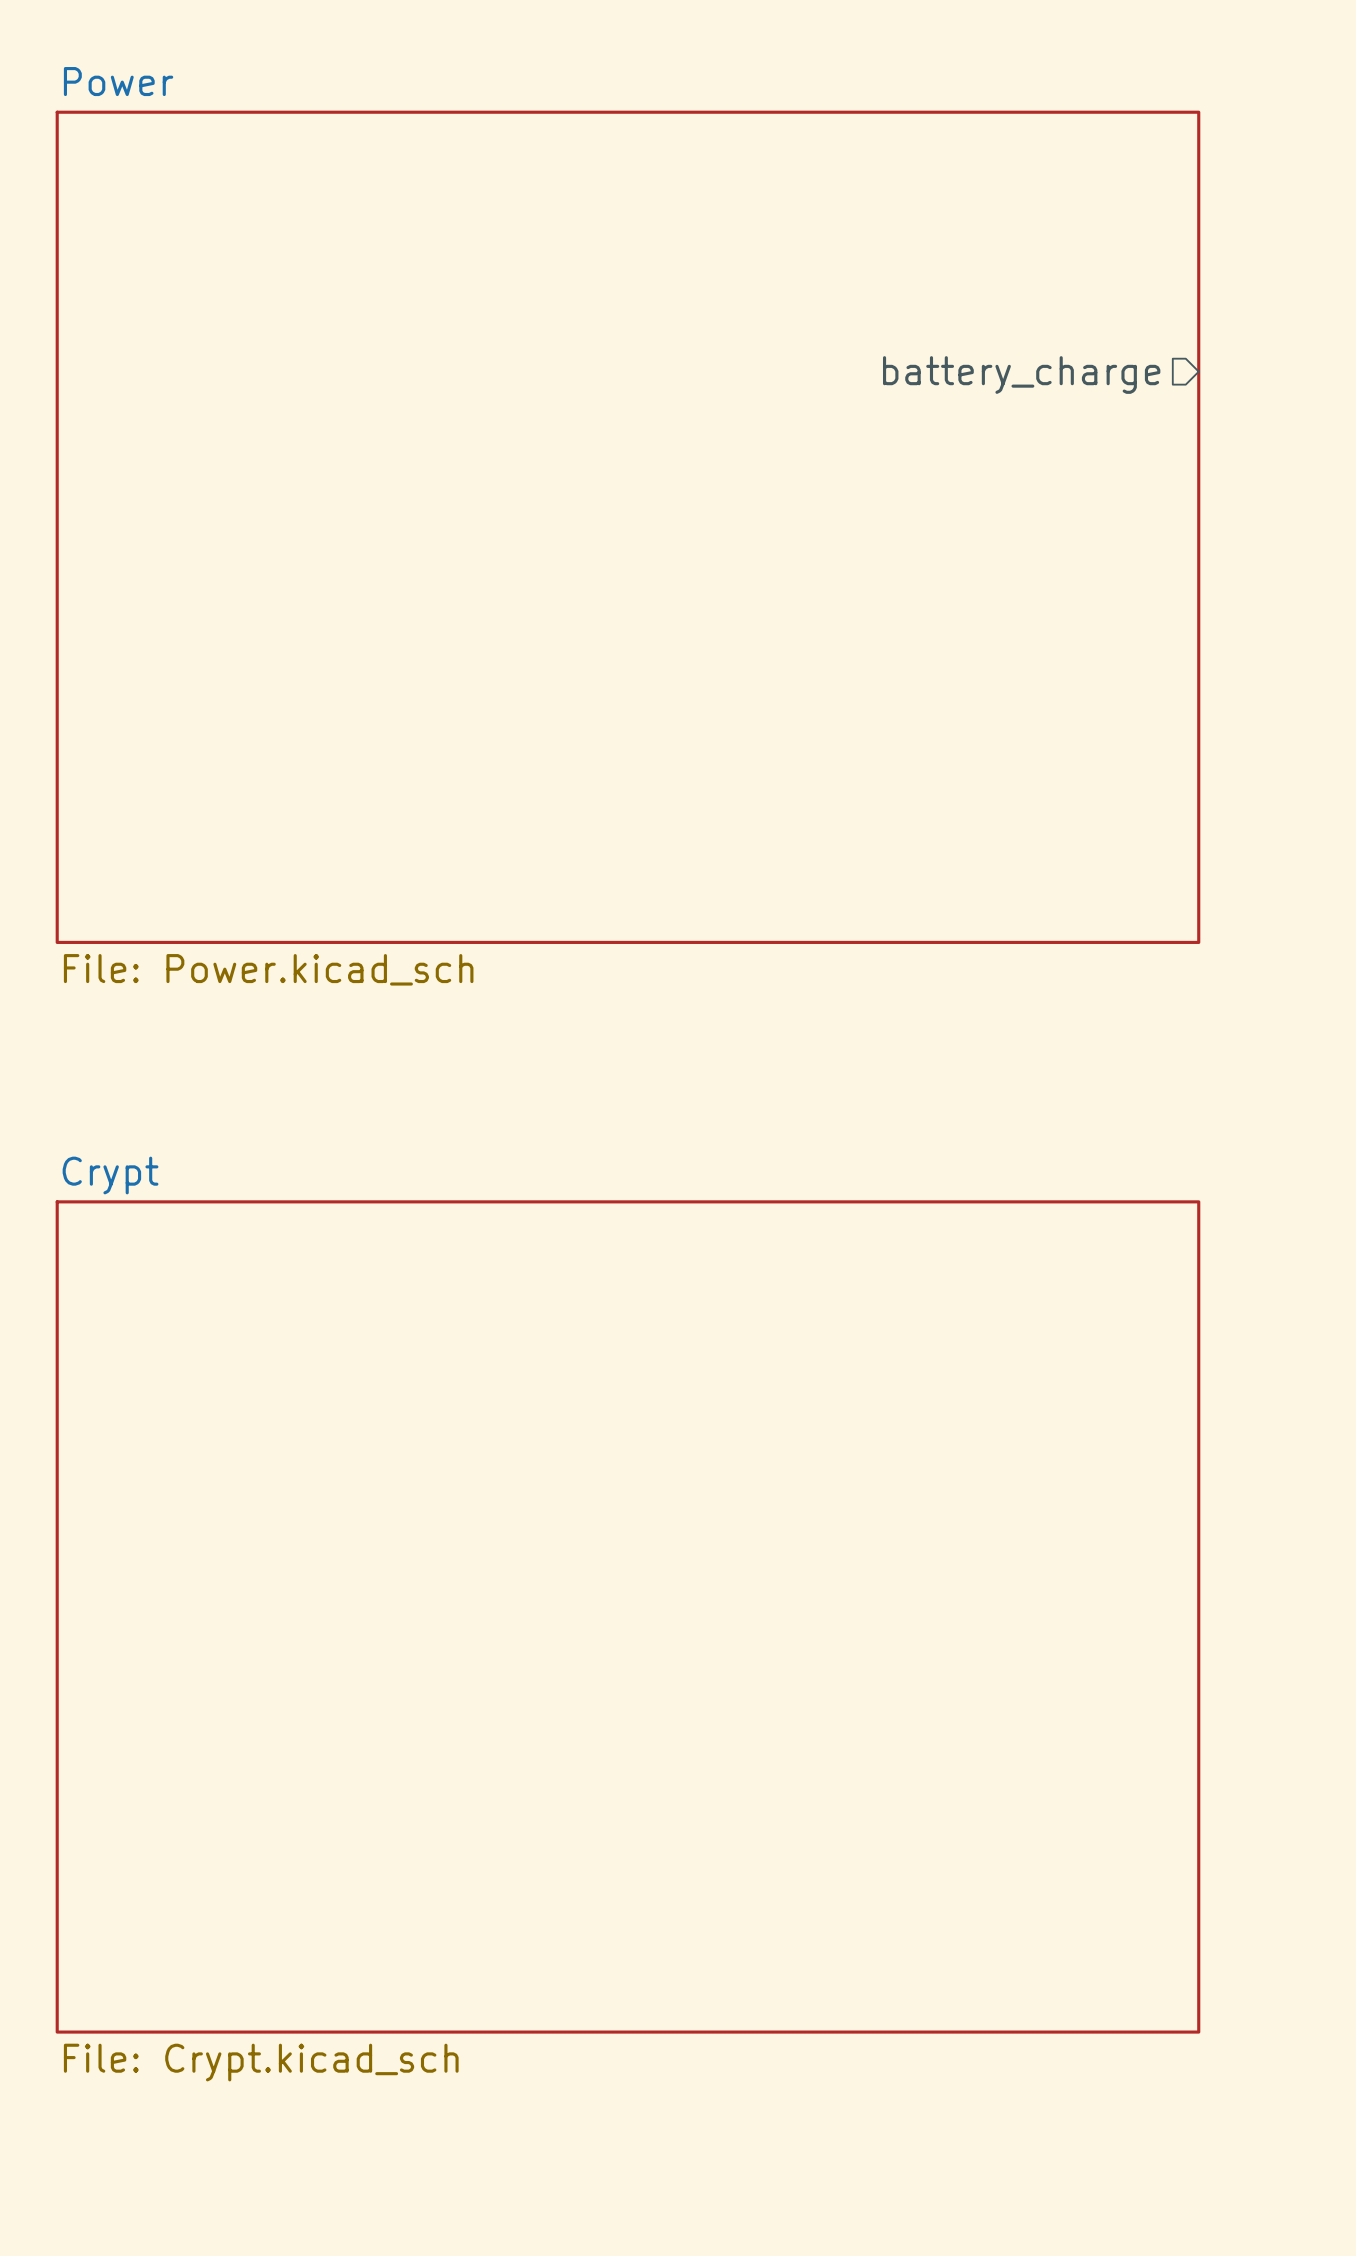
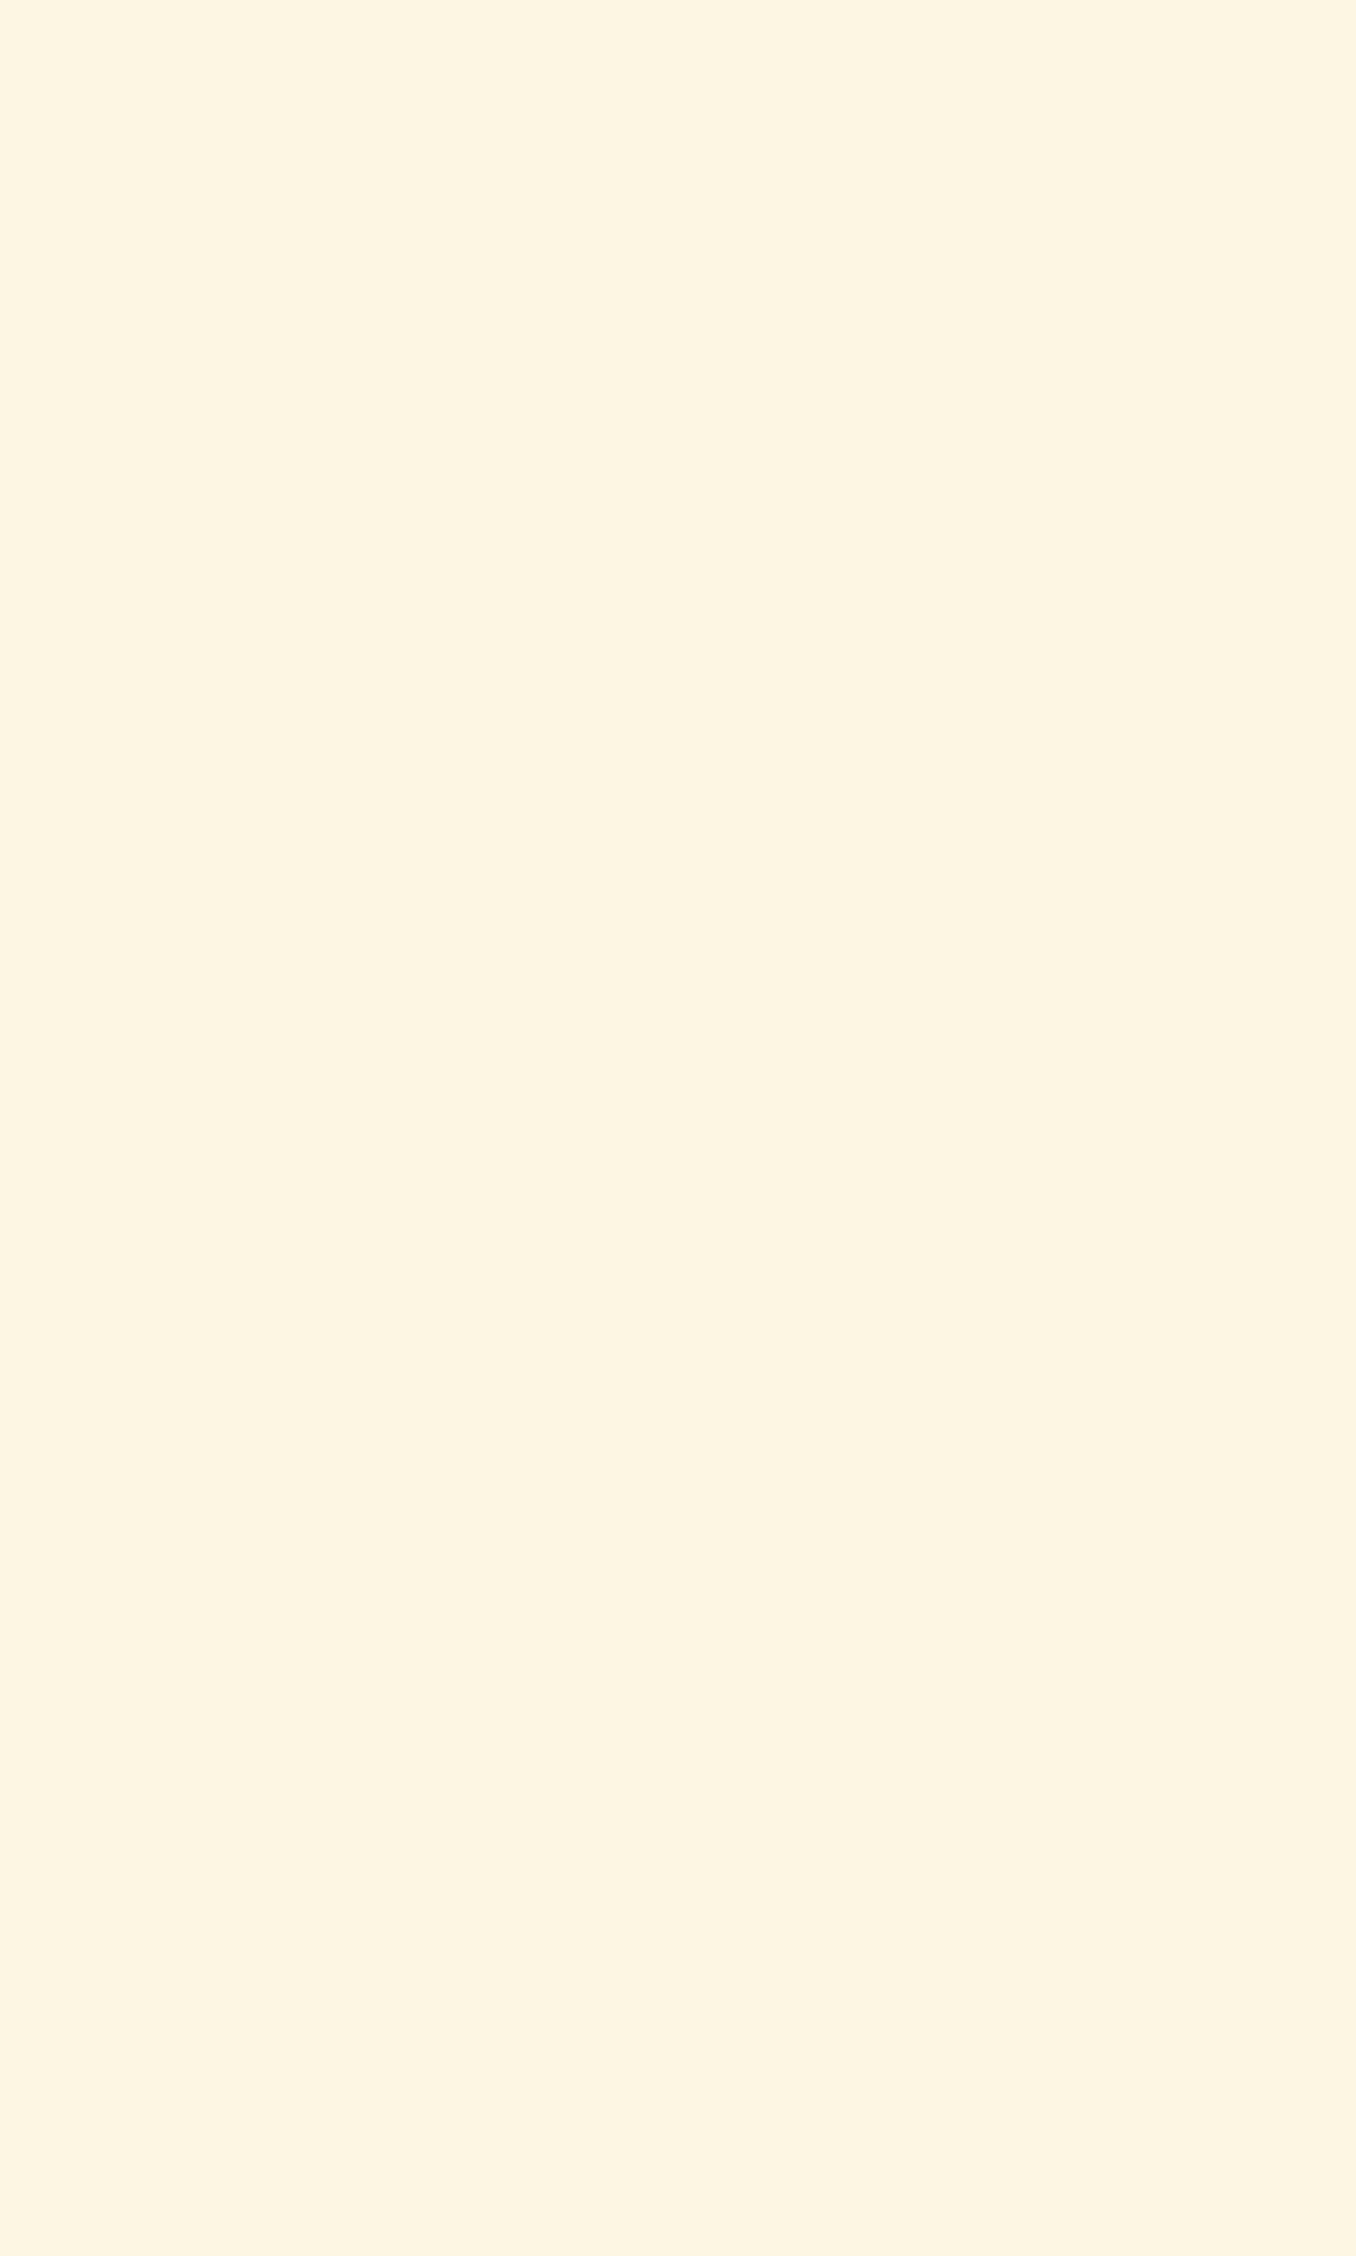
sheet pin: battery_charge (1021, 375) -> none
sheet Power: File: Power.kicad_sch (627, 527) -> none
sheet Crypt: File: Crypt.kicad_sch (627, 1616) -> none

